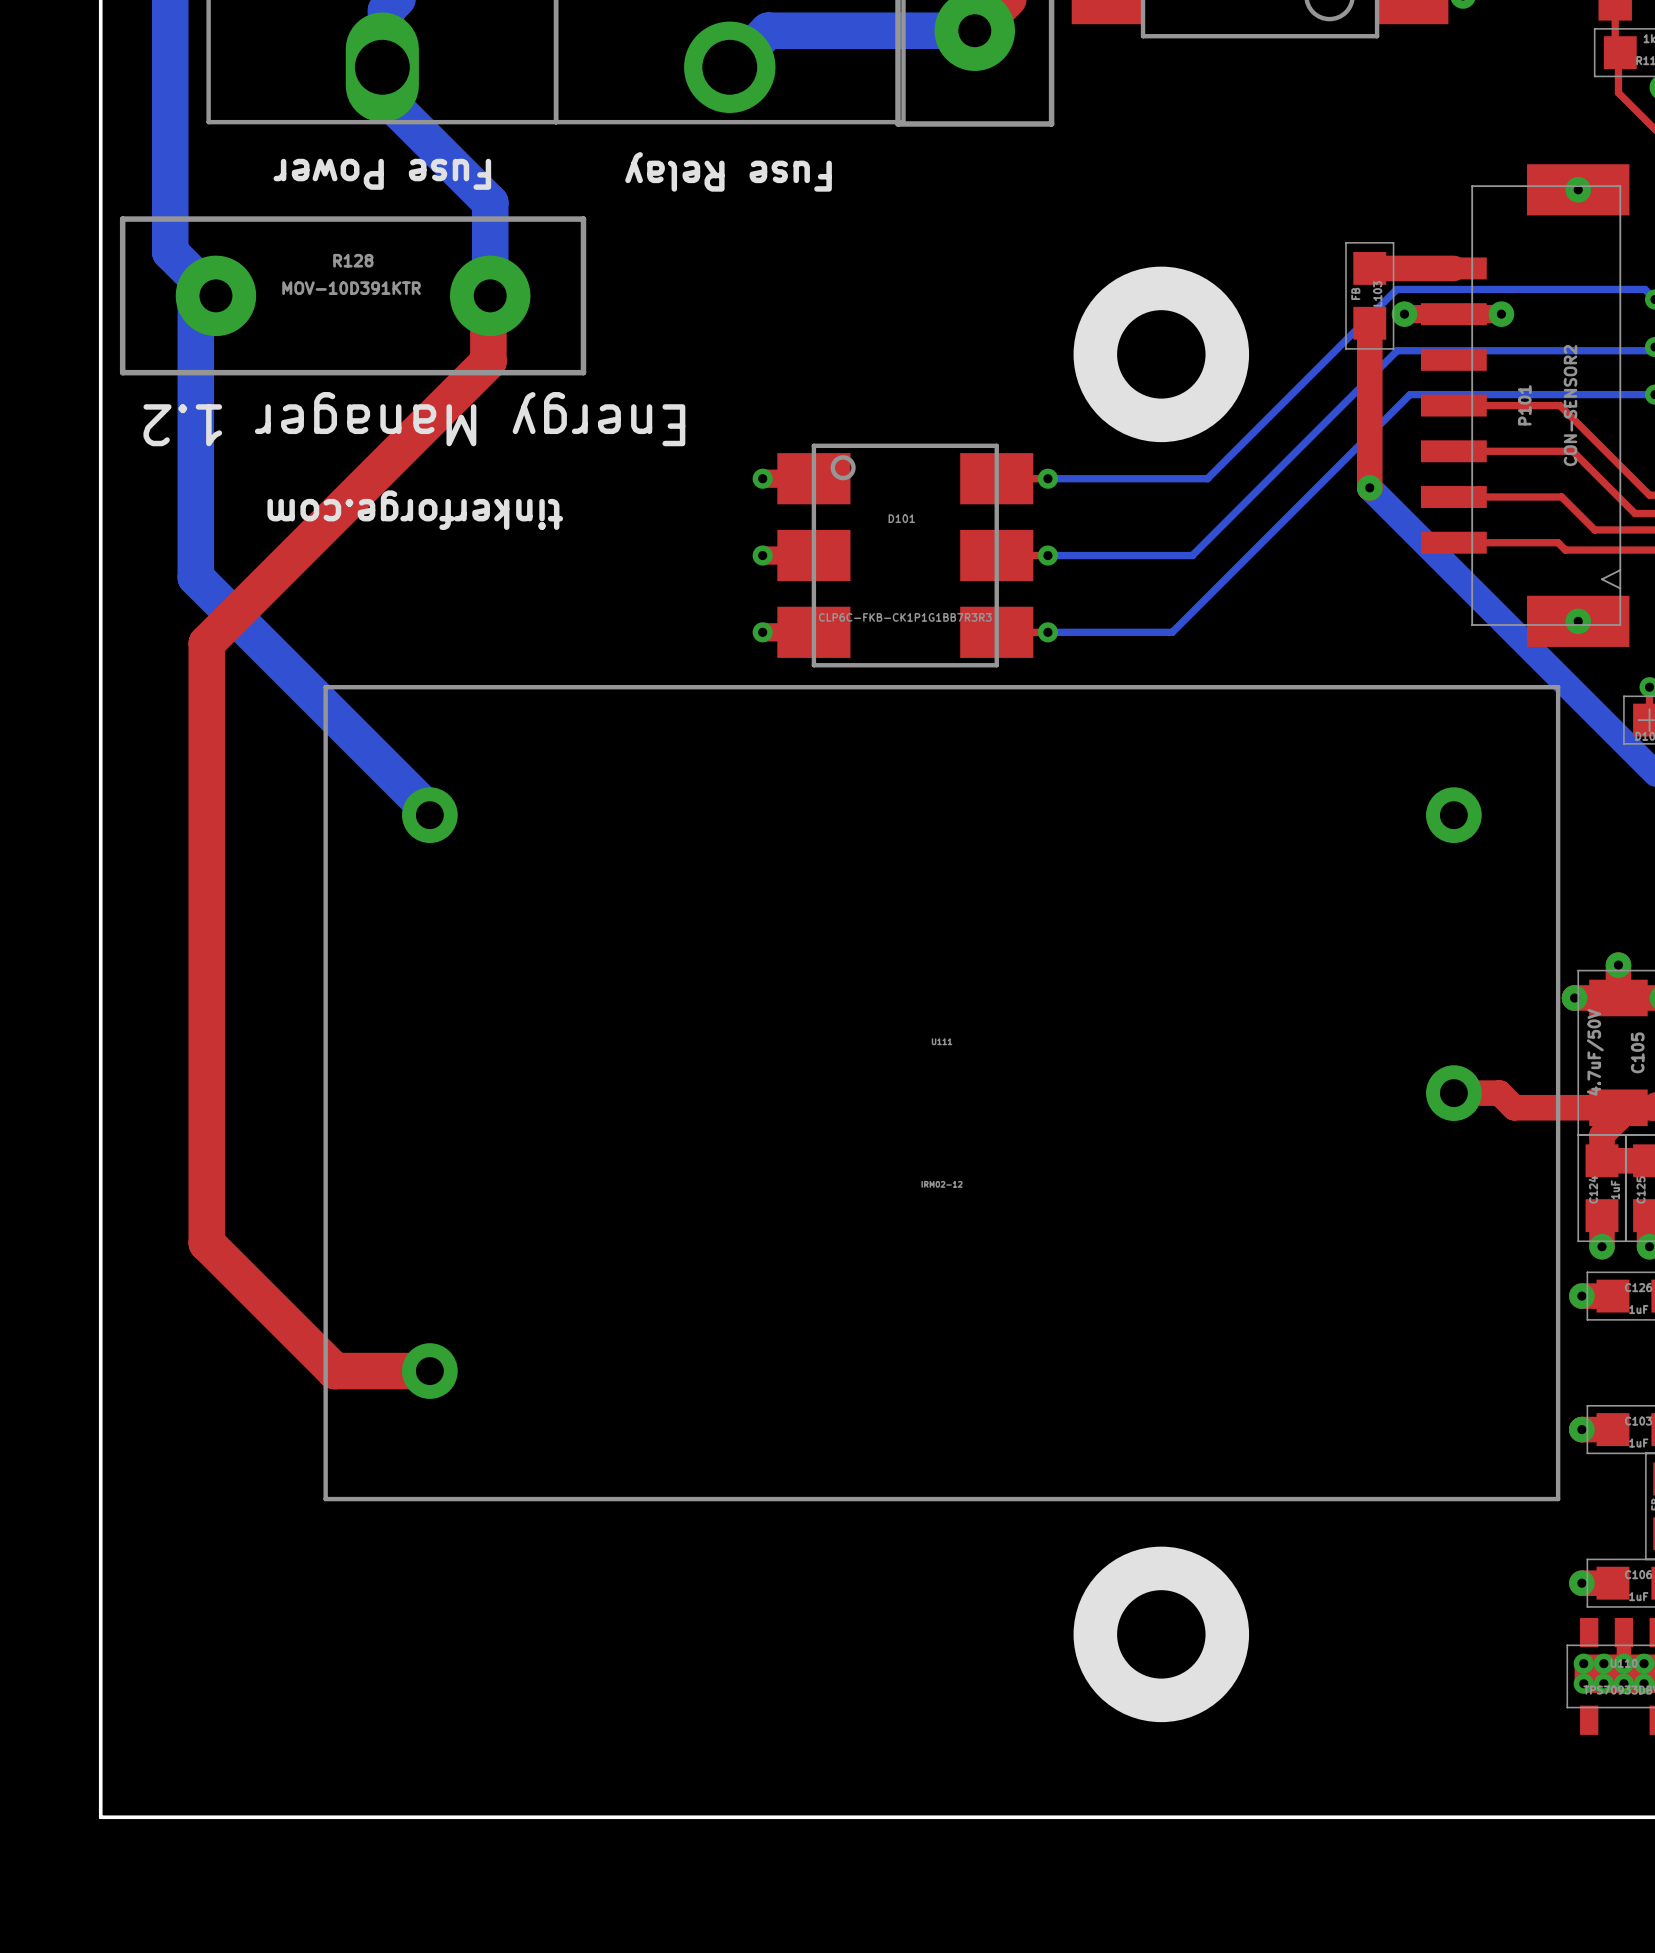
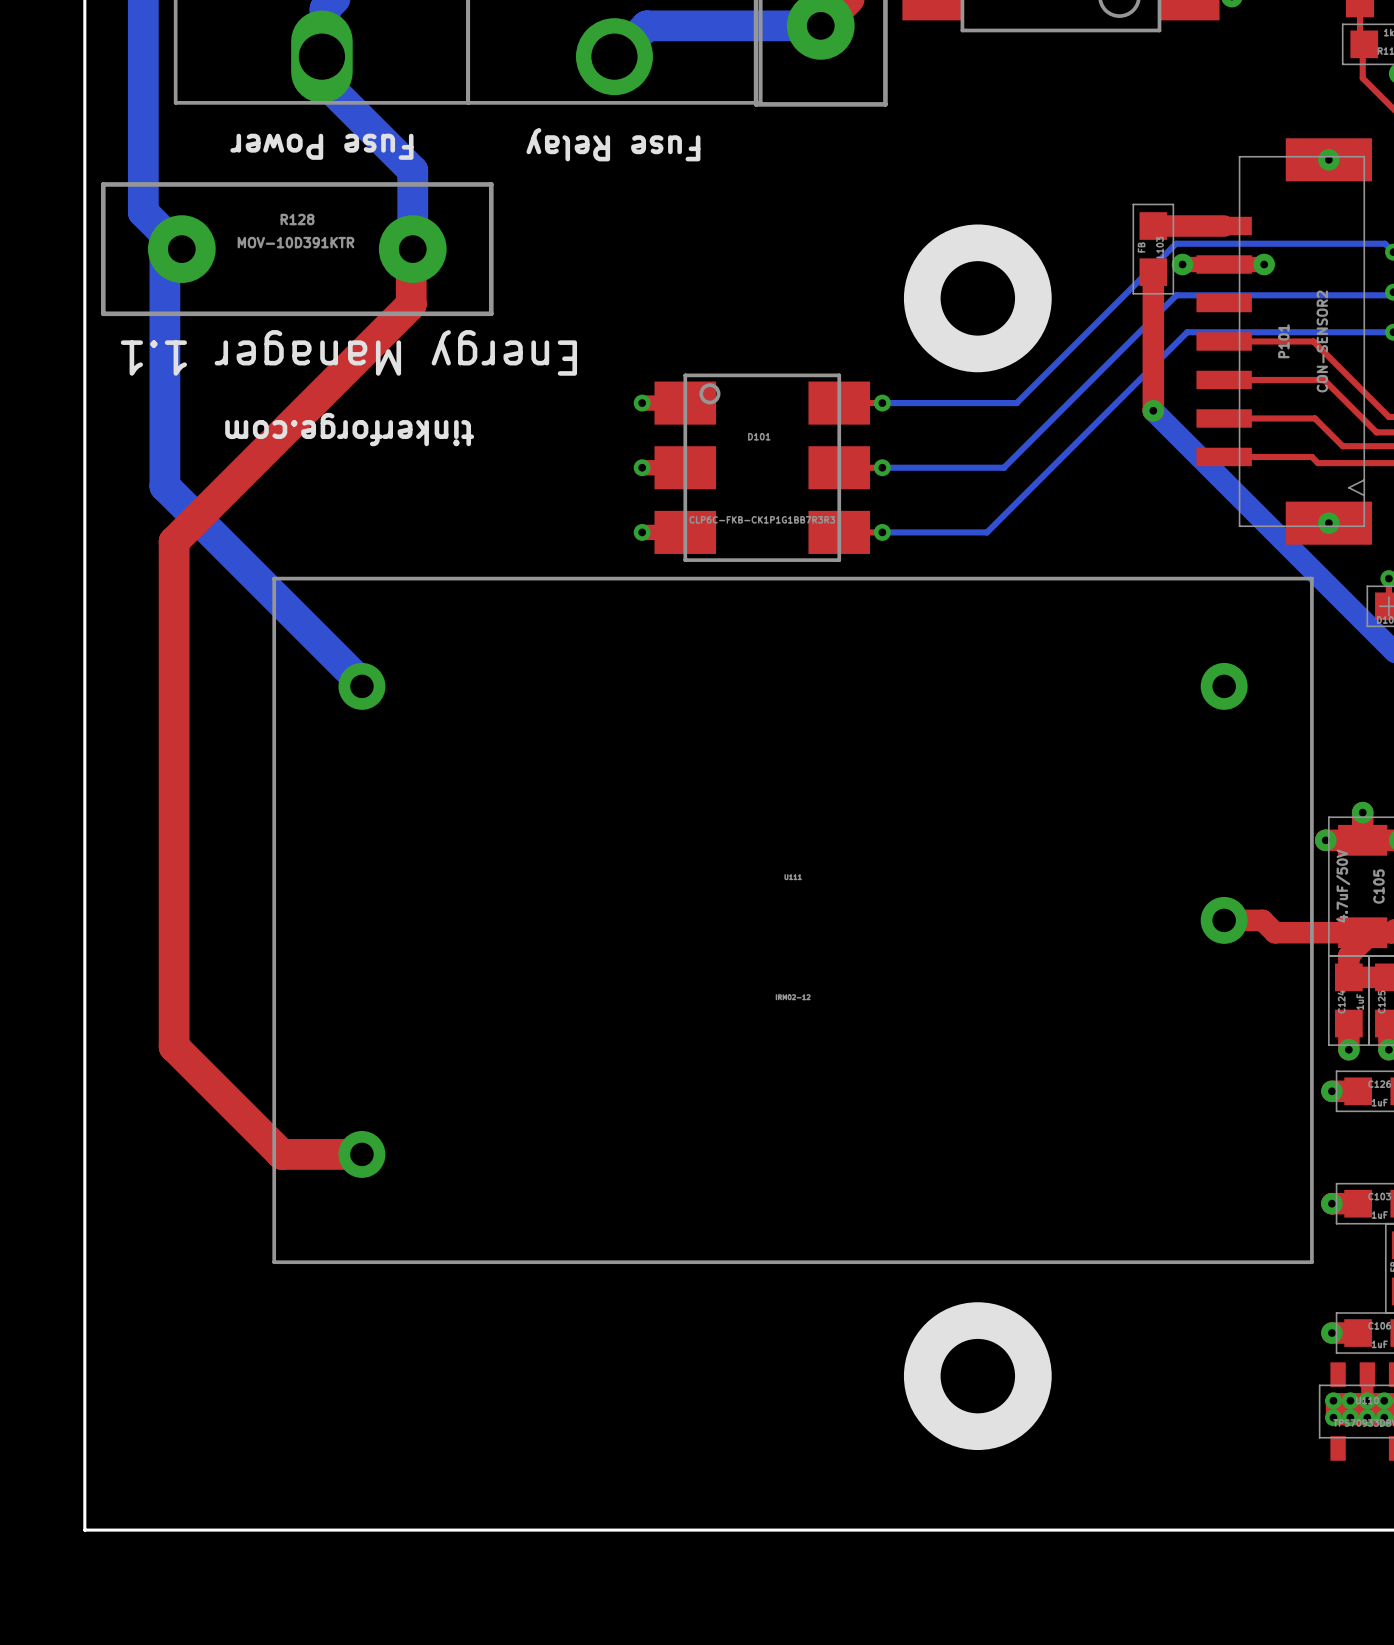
text: Energy Manager 1.2 (414, 419) -> Energy Manager 1.1 (348, 352)

